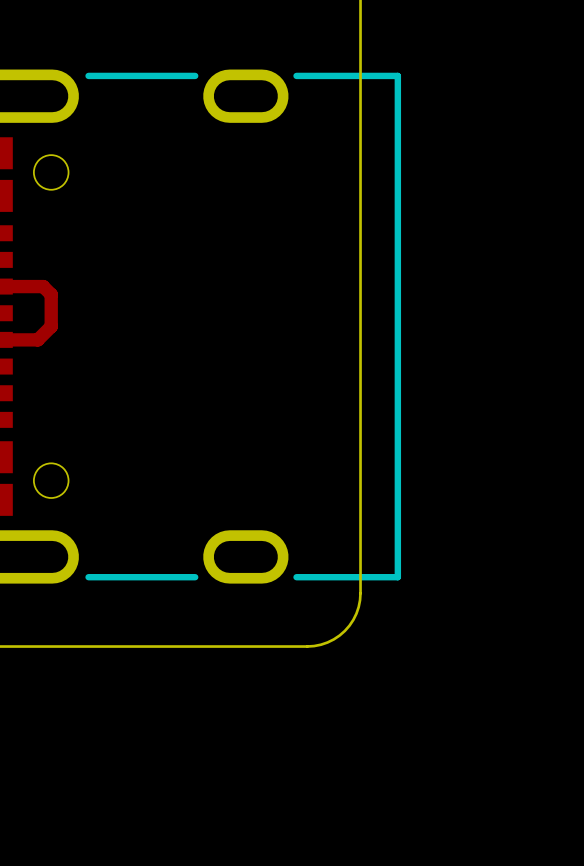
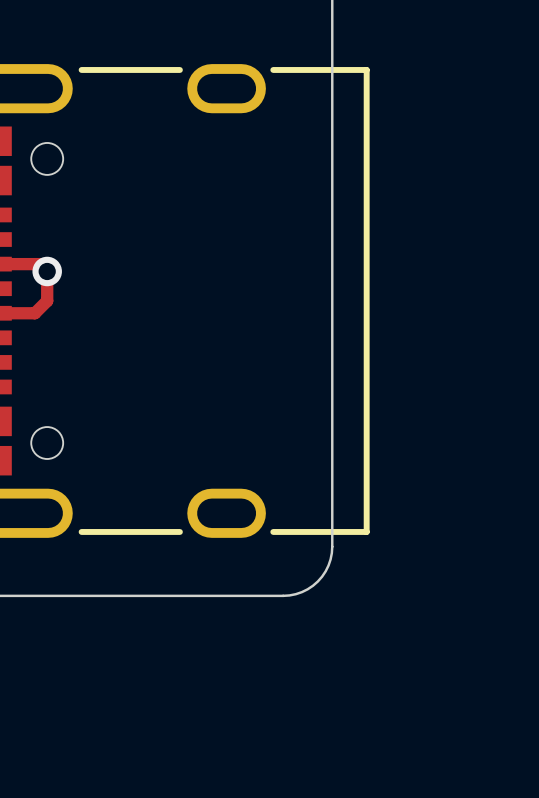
via: none -> (47, 271)

